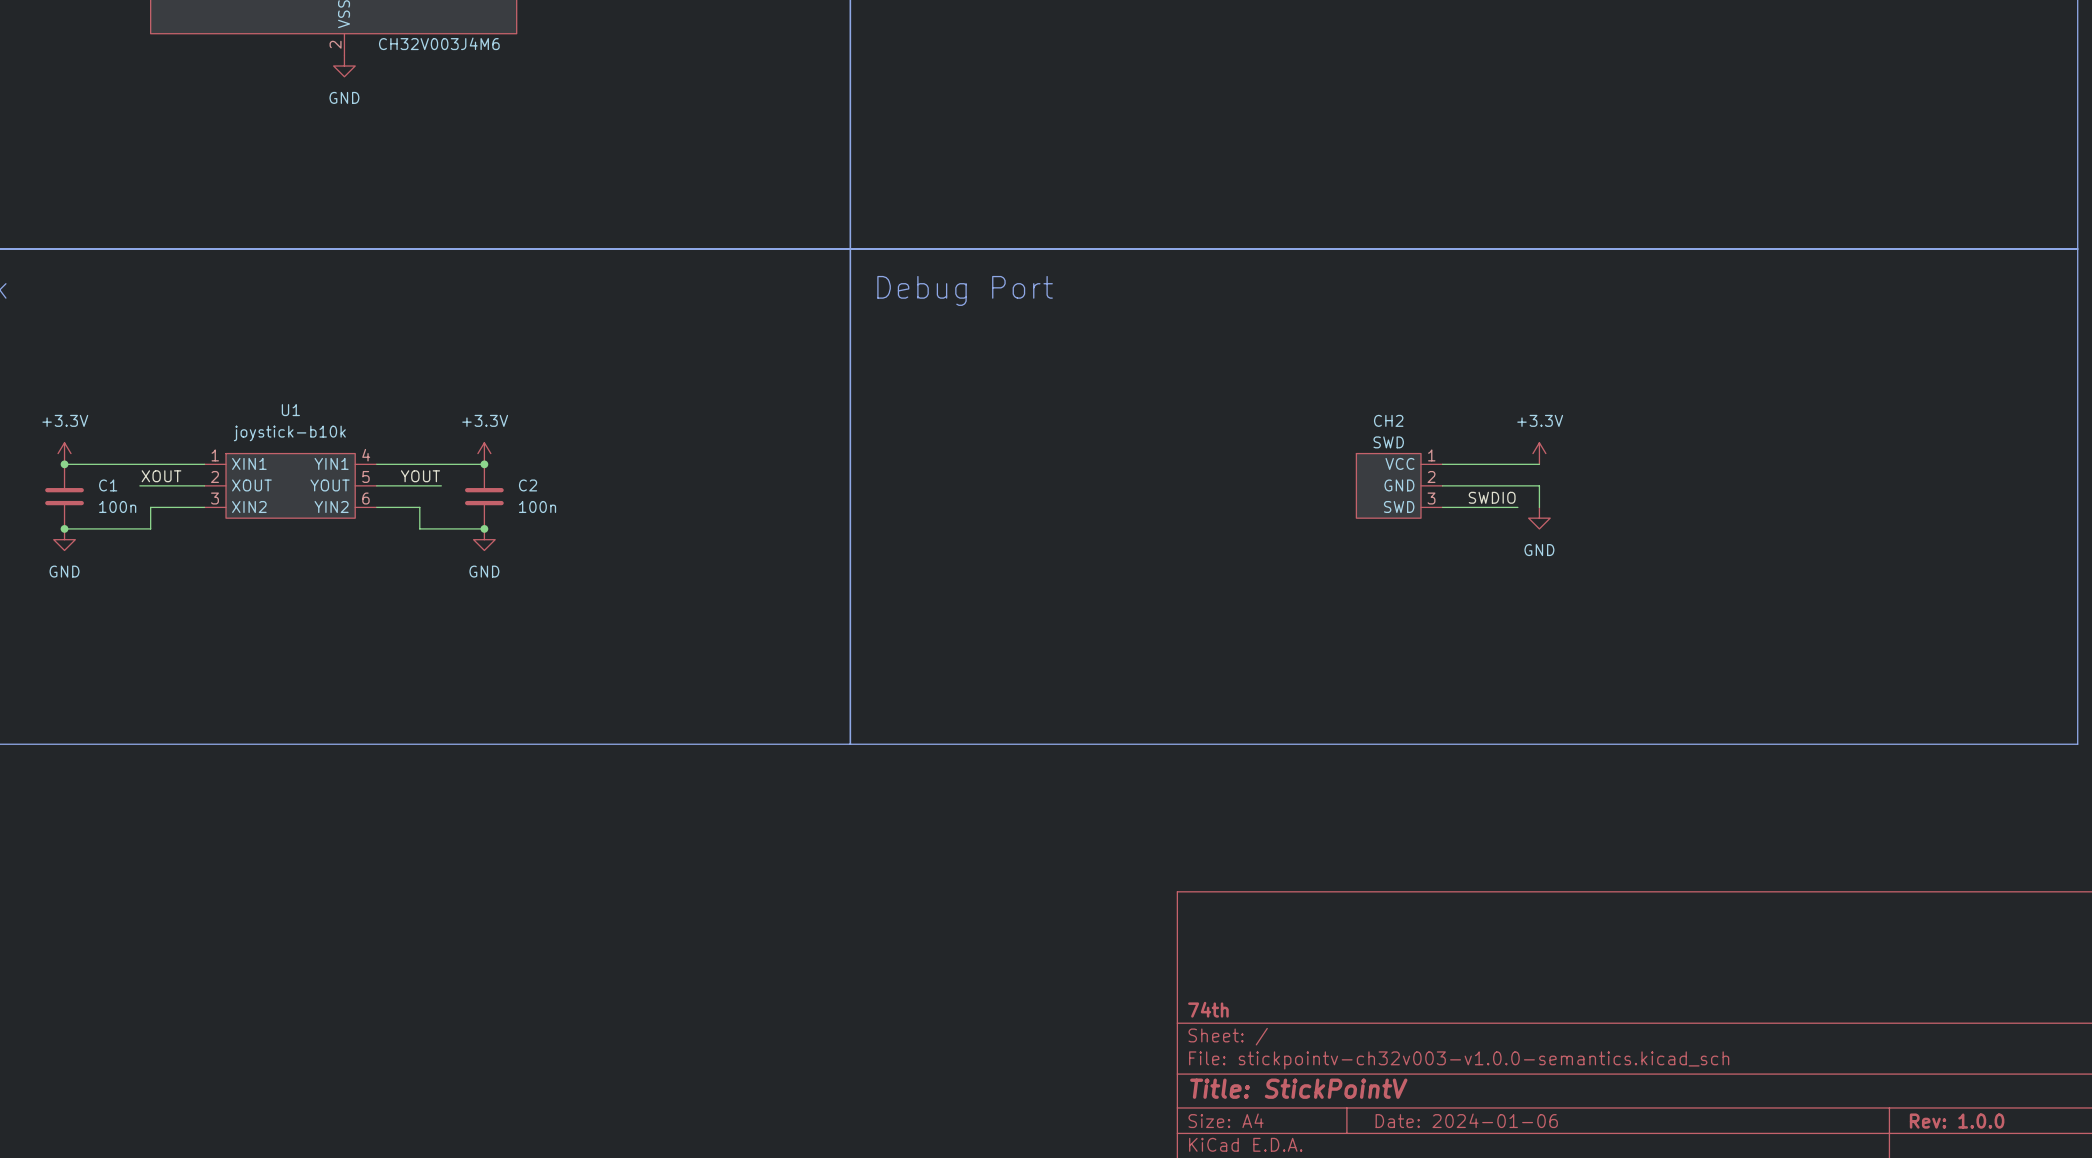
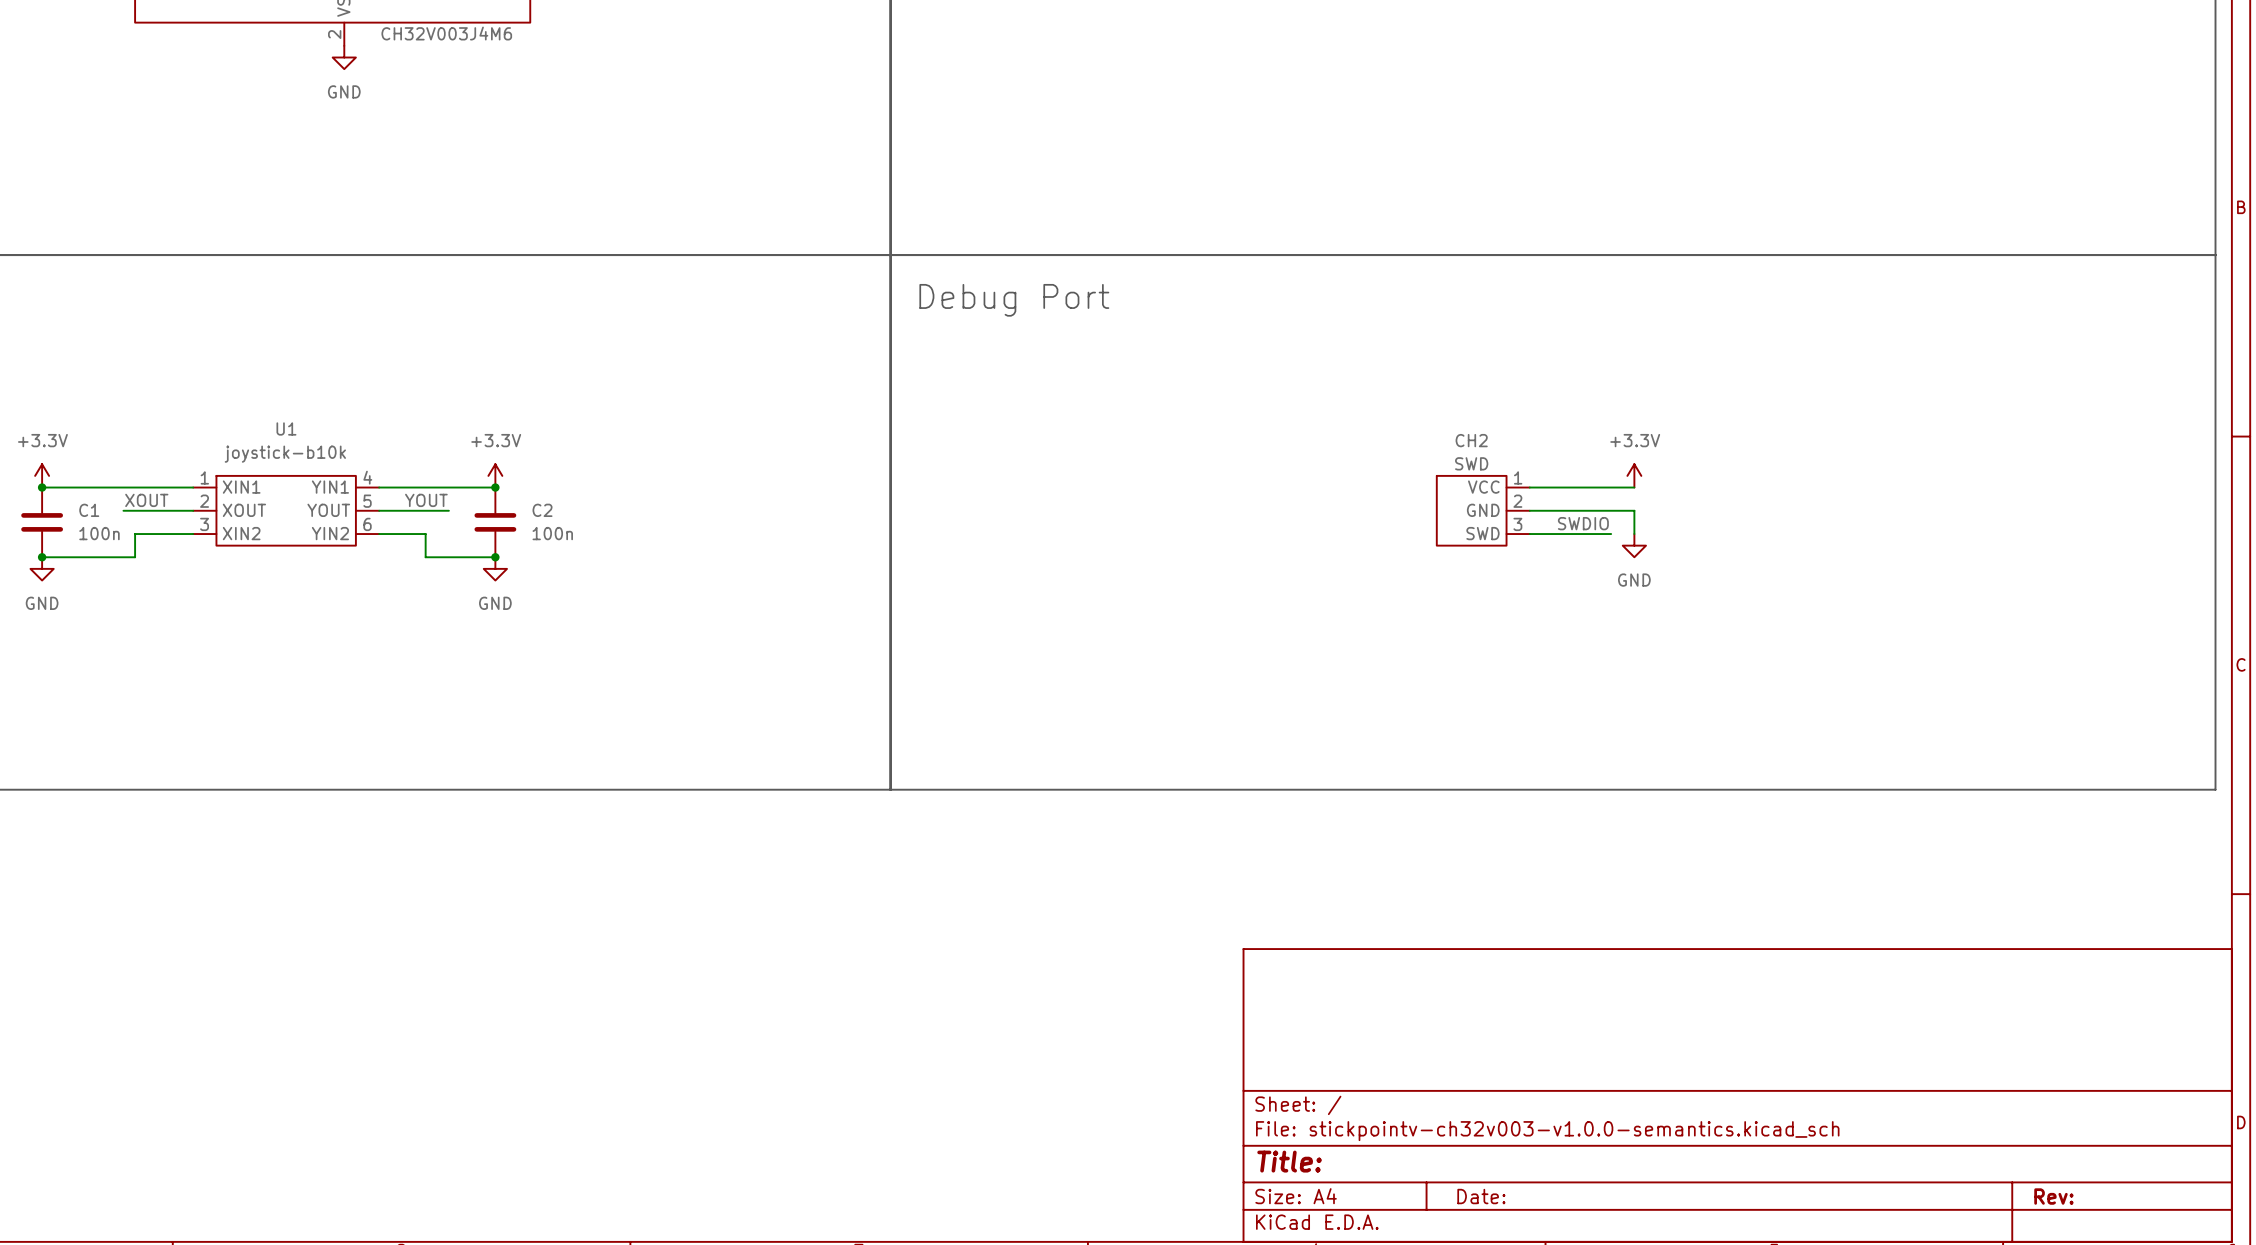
title block: 74th (1208, 1009) -> none
title block: Title: StickPointV (1298, 1088) -> Title: (1289, 1161)
title block: Date: 2024-01-06 (1466, 1120) -> Date: (1481, 1196)
title block: Rev: 1.0.0 (1957, 1121) -> Rev: (2053, 1196)

